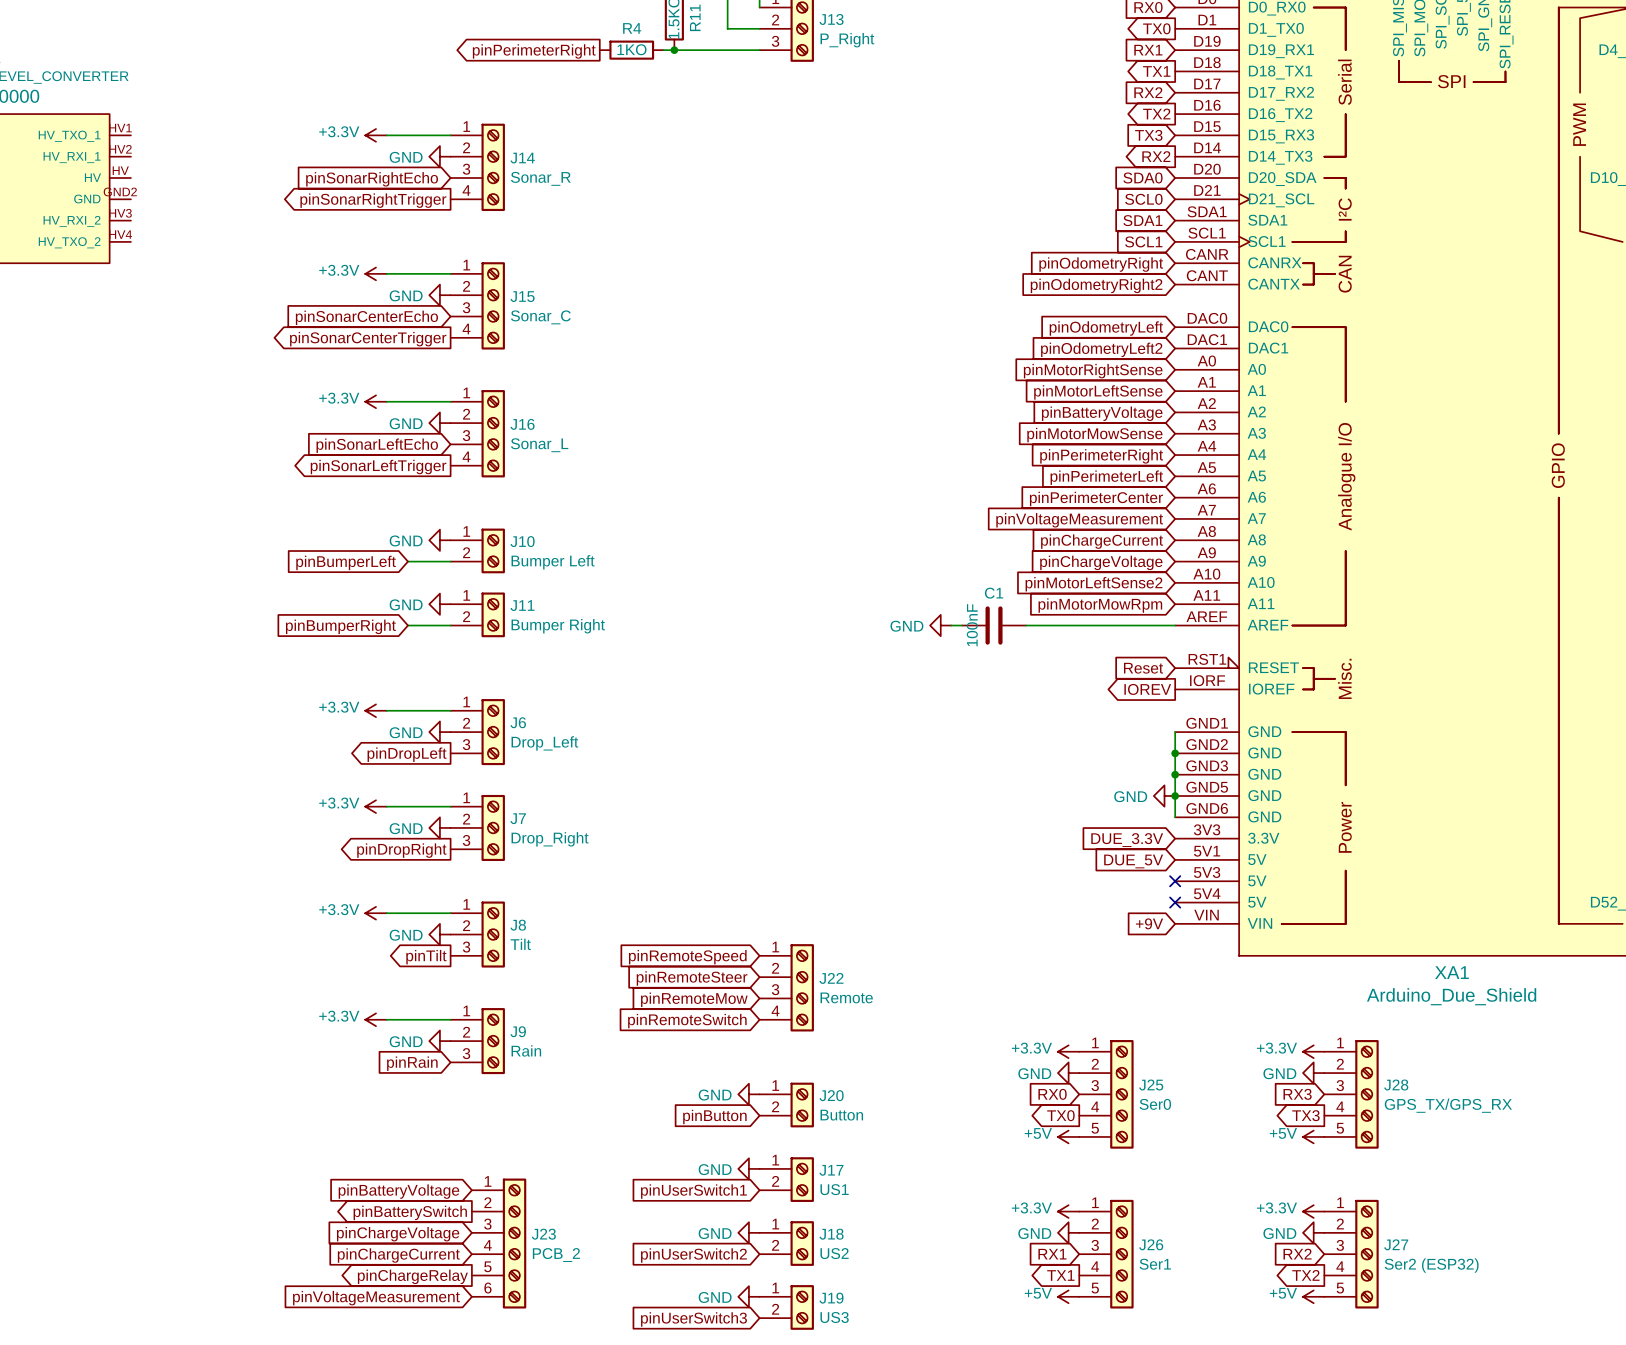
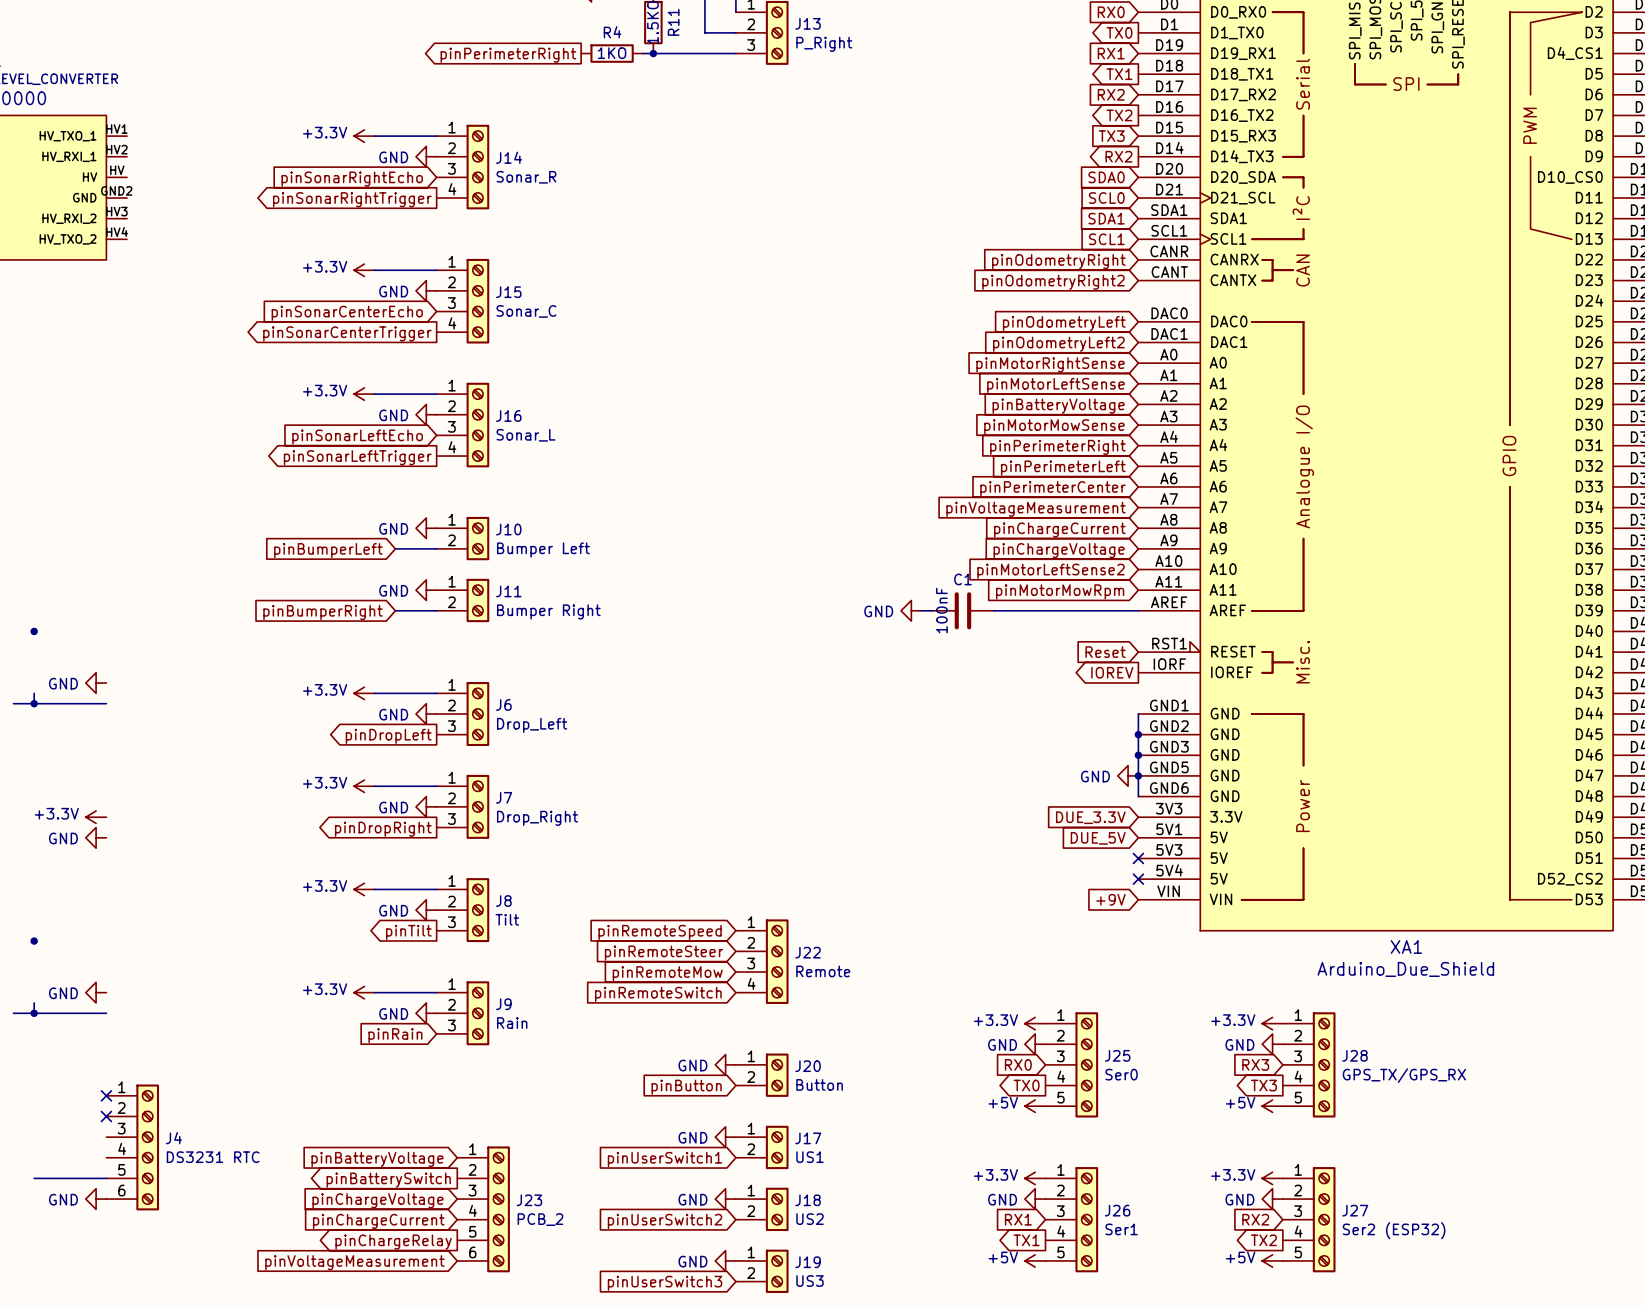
junction: none -> (34, 631)
power symbol: none -> GND (96, 683)
wire: none -> (34, 693) (34, 703)
wire: none -> (13, 703) (106, 703)
junction: none -> (34, 703)
power symbol: none -> +3.3V (96, 817)
power symbol: none -> GND (96, 837)
junction: none -> (34, 941)
power symbol: none -> GND (96, 992)
wire: none -> (34, 1002) (34, 1013)
wire: none -> (13, 1013) (106, 1013)
junction: none -> (34, 1013)
no-connect mark: none -> (106, 1095)
no-connect mark: none -> (106, 1116)
J4: none -> DS3231 RTC (132, 1147)
wire: none -> (34, 1178) (106, 1178)
power symbol: none -> GND (96, 1199)

